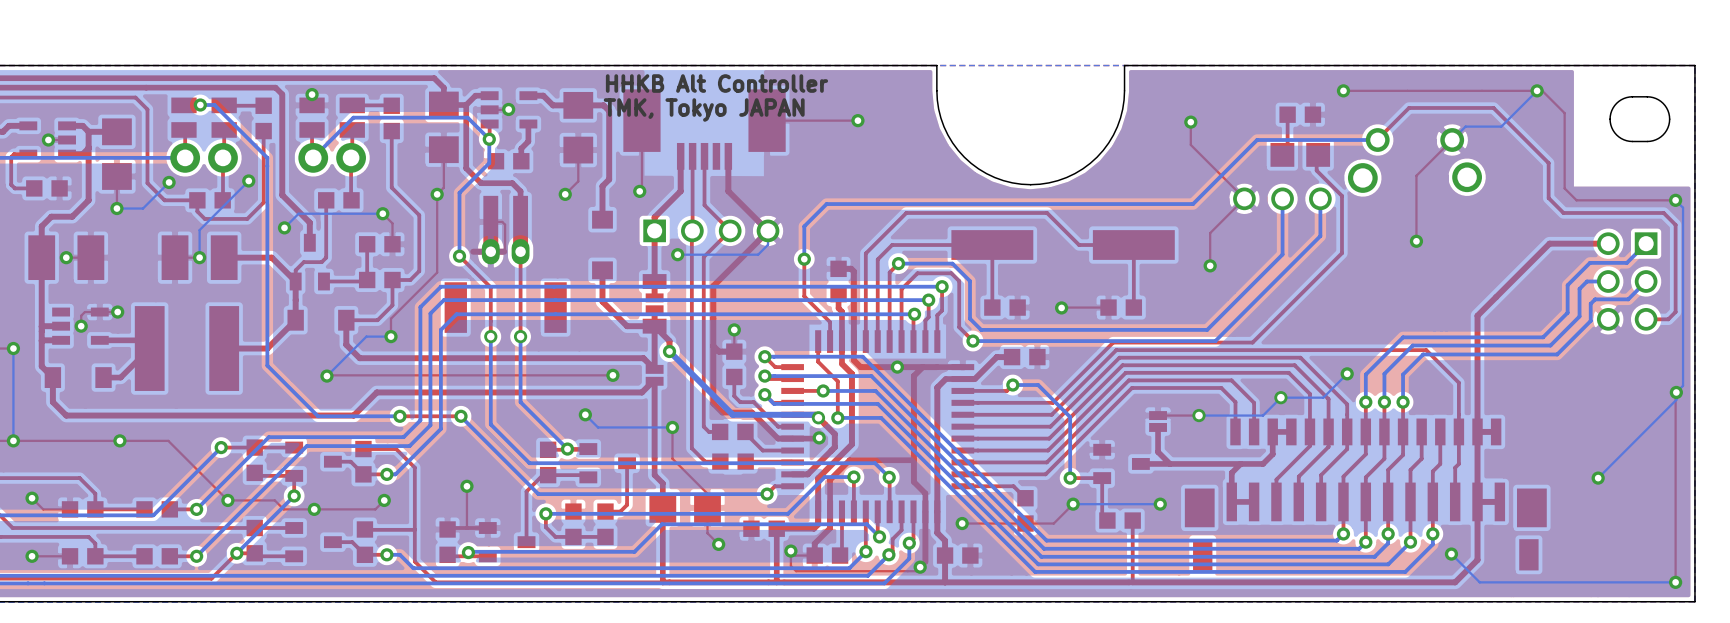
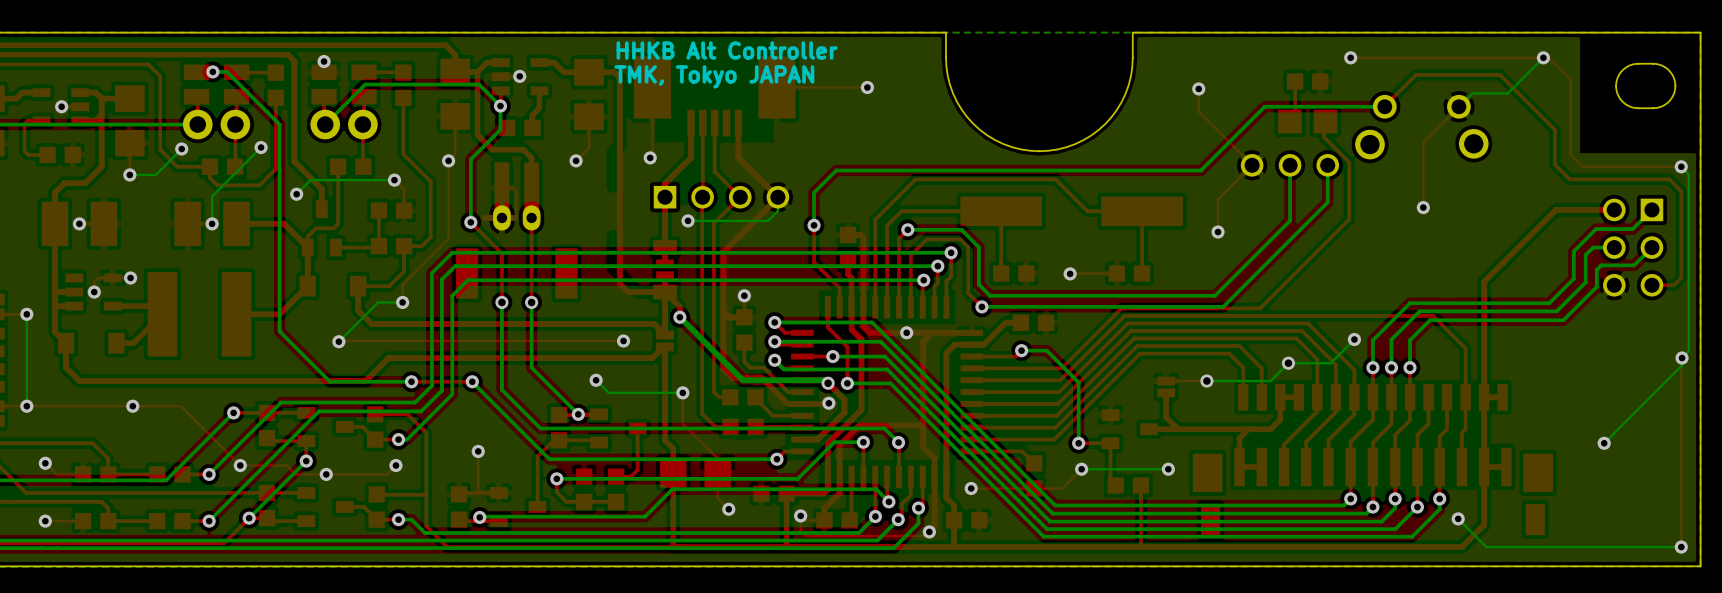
top track: (609, 179) (602, 186) (602, 219) -> none
part: (602, 245) -> none
top track: (602, 270) (602, 301) (627, 326) -> (619, 146) (619, 283) (627, 292) (637, 292)

